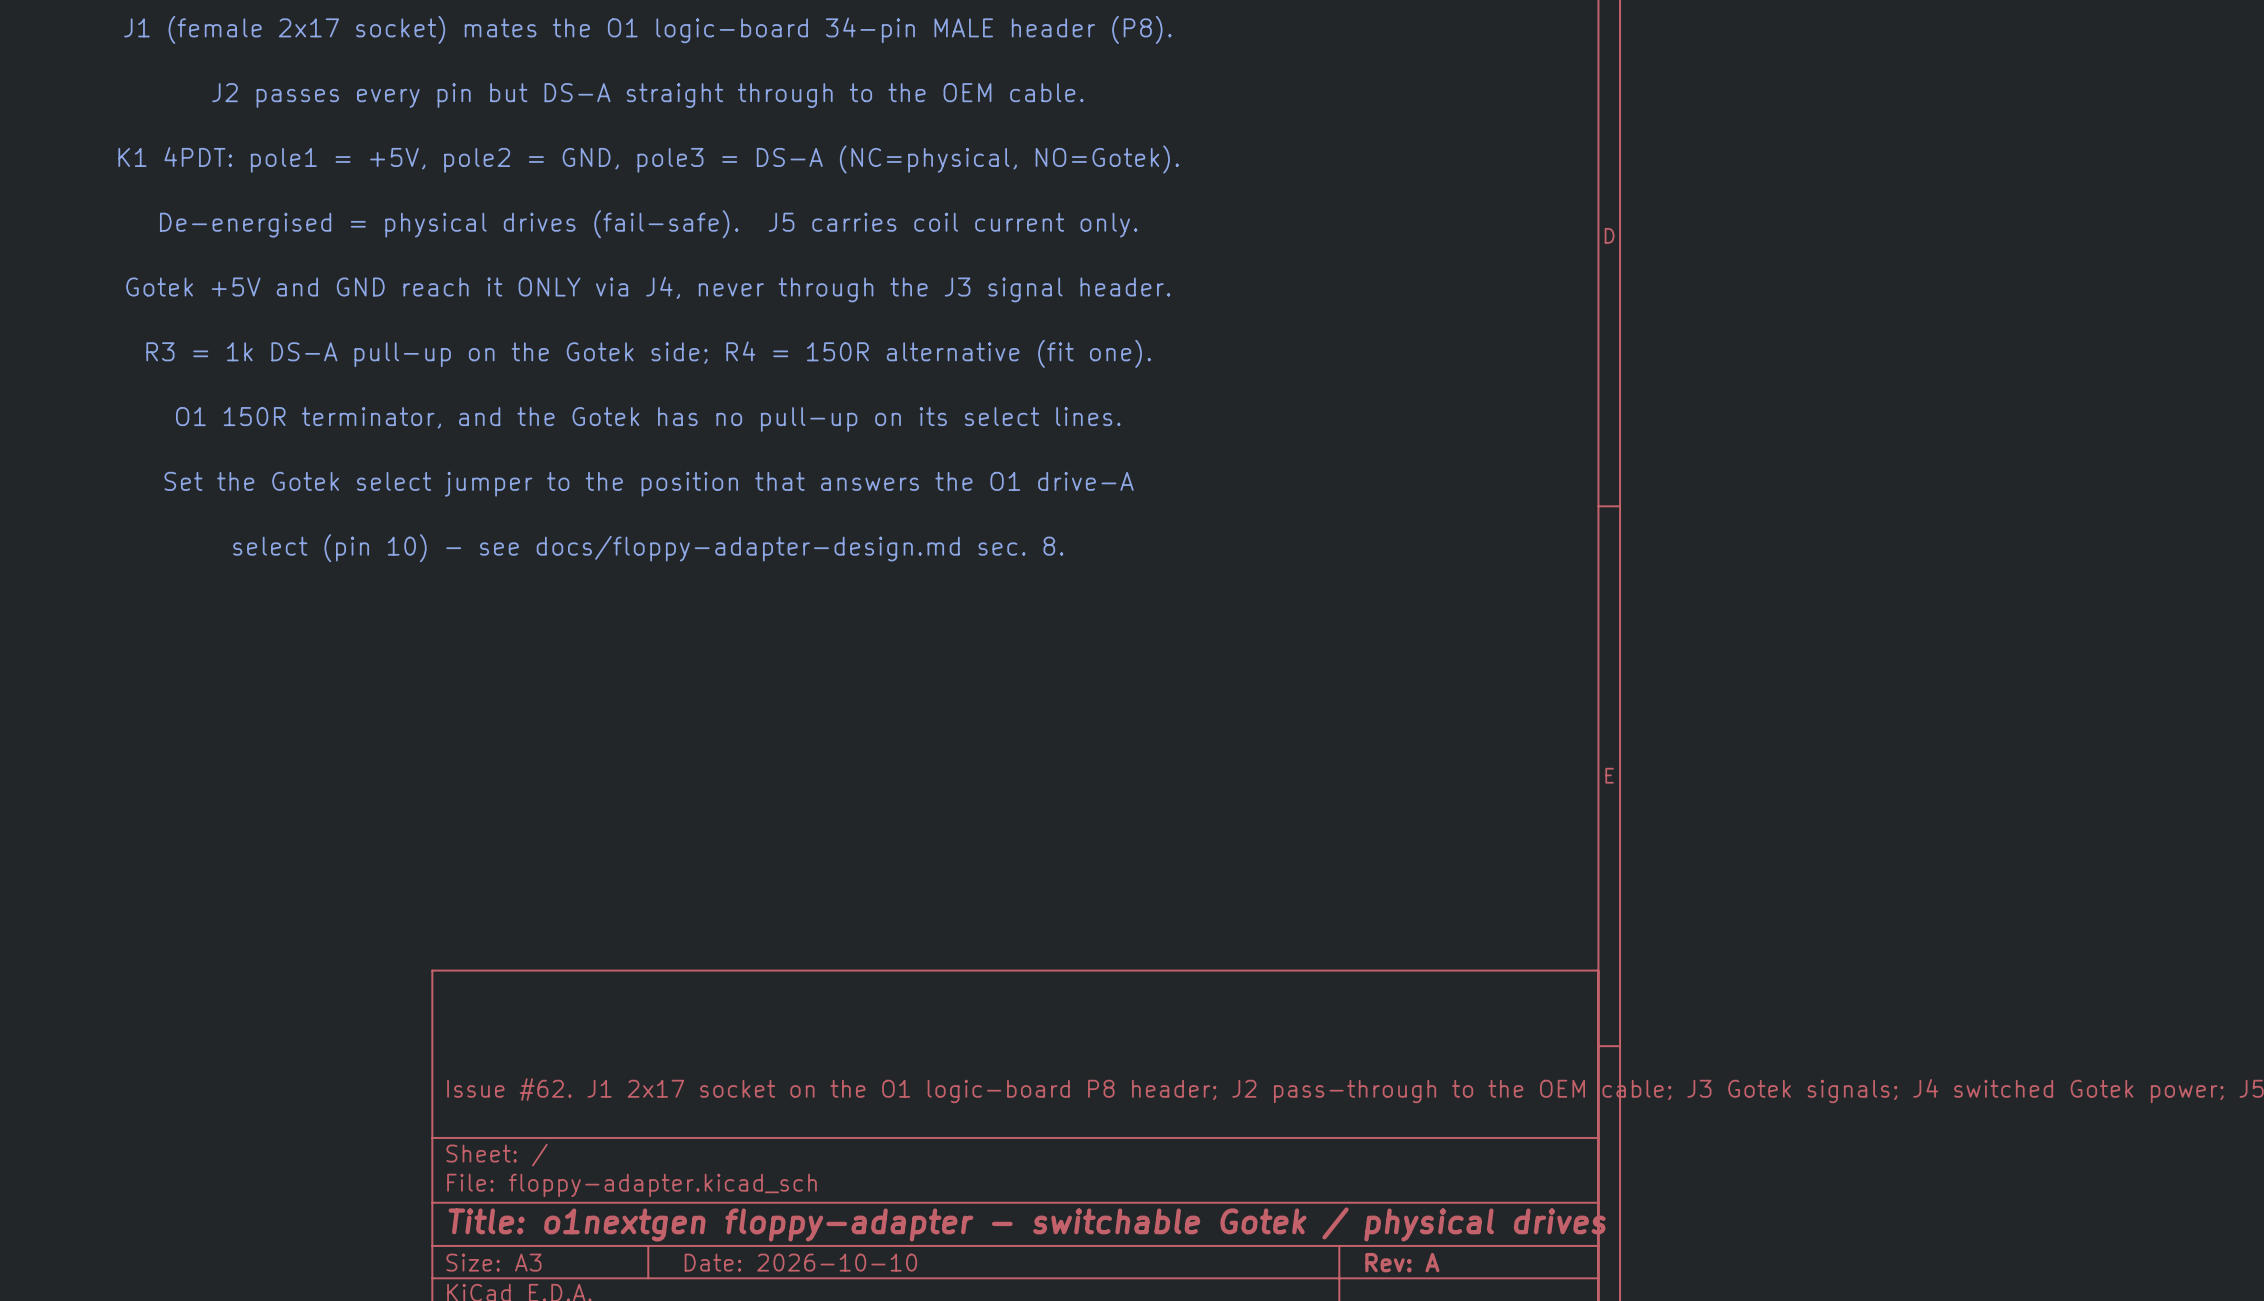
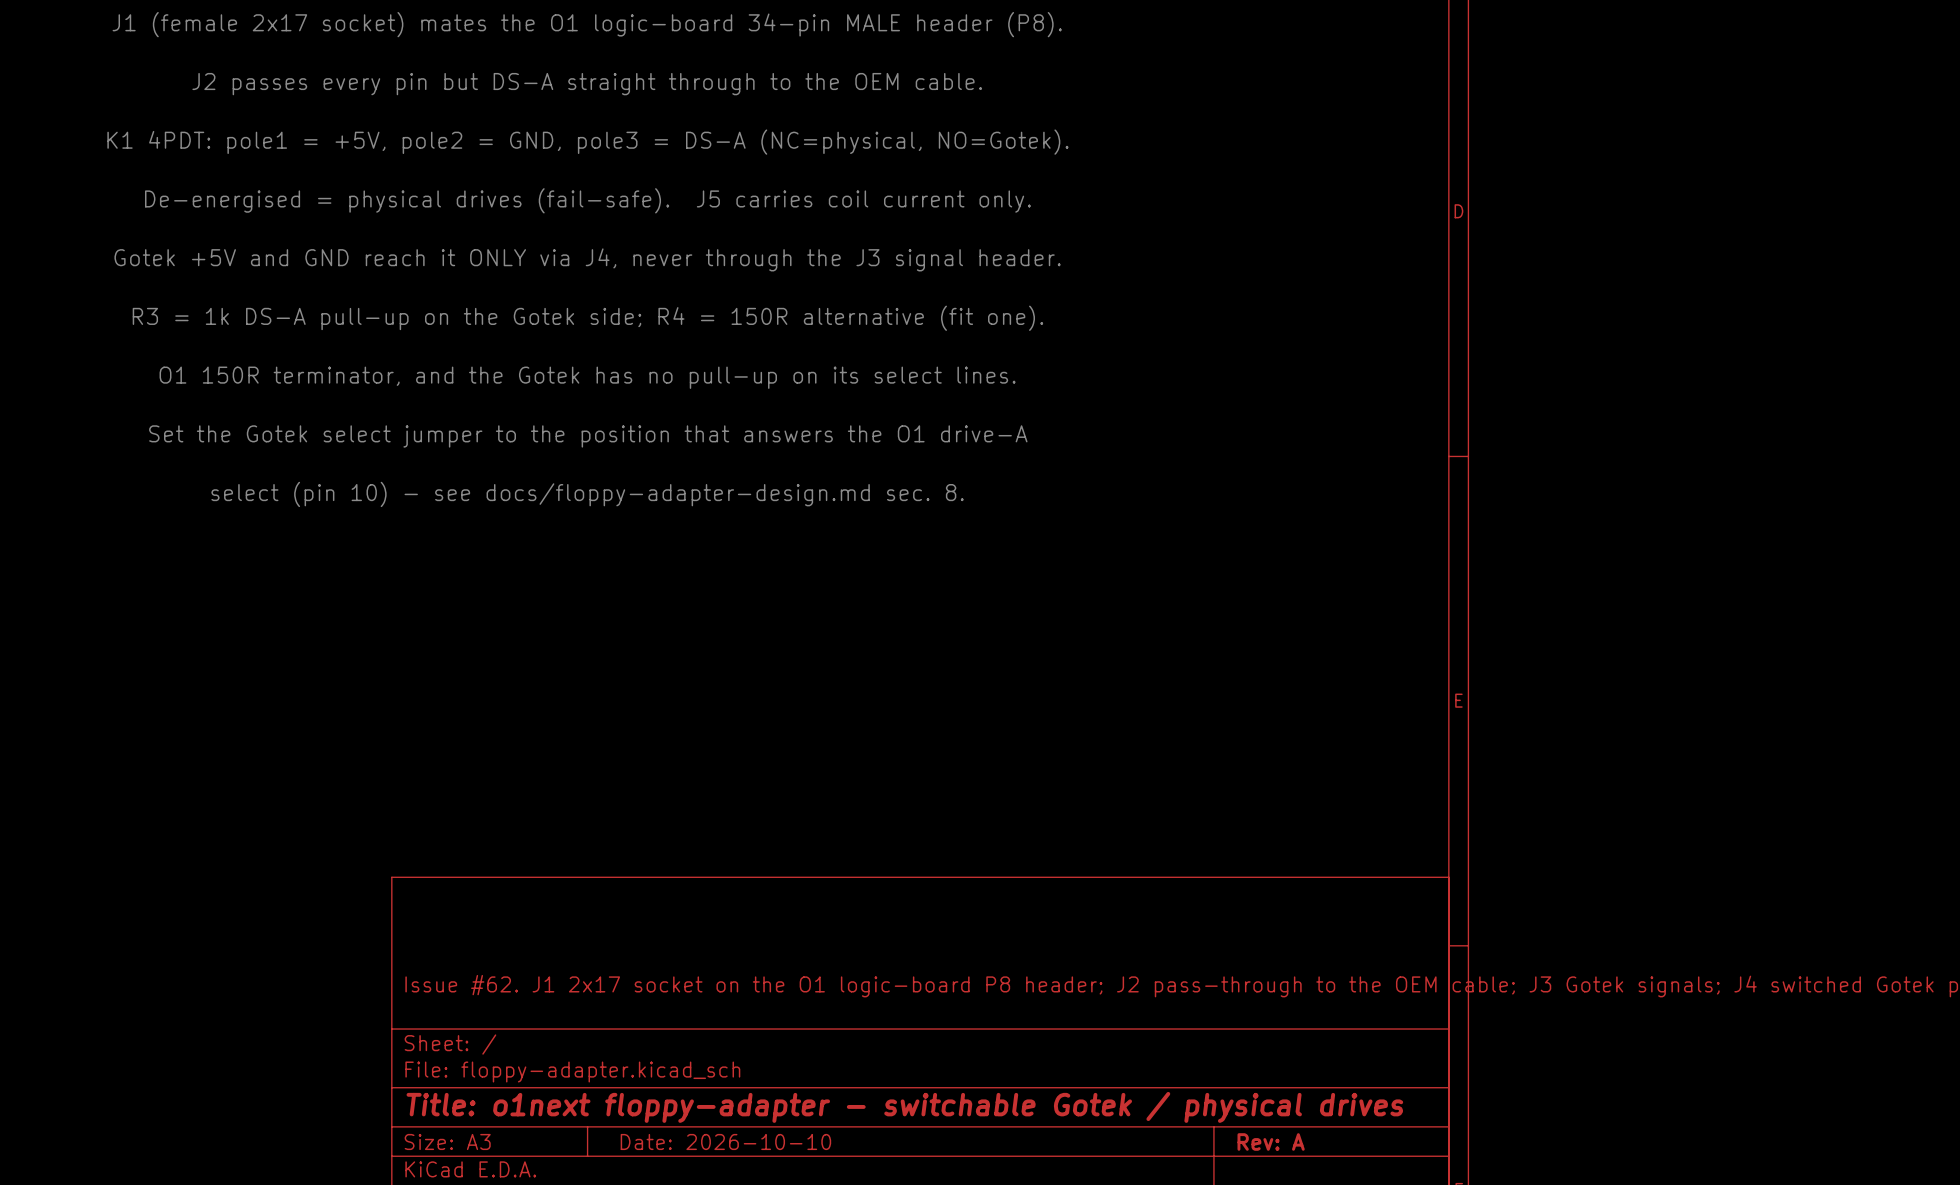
title block: Title: o1nextgen floppy-adapter - switchable Gotek / physical drives (1027, 1224) -> Title: o1next floppy-adapter - switchable Gotek / physical drives (904, 1107)

